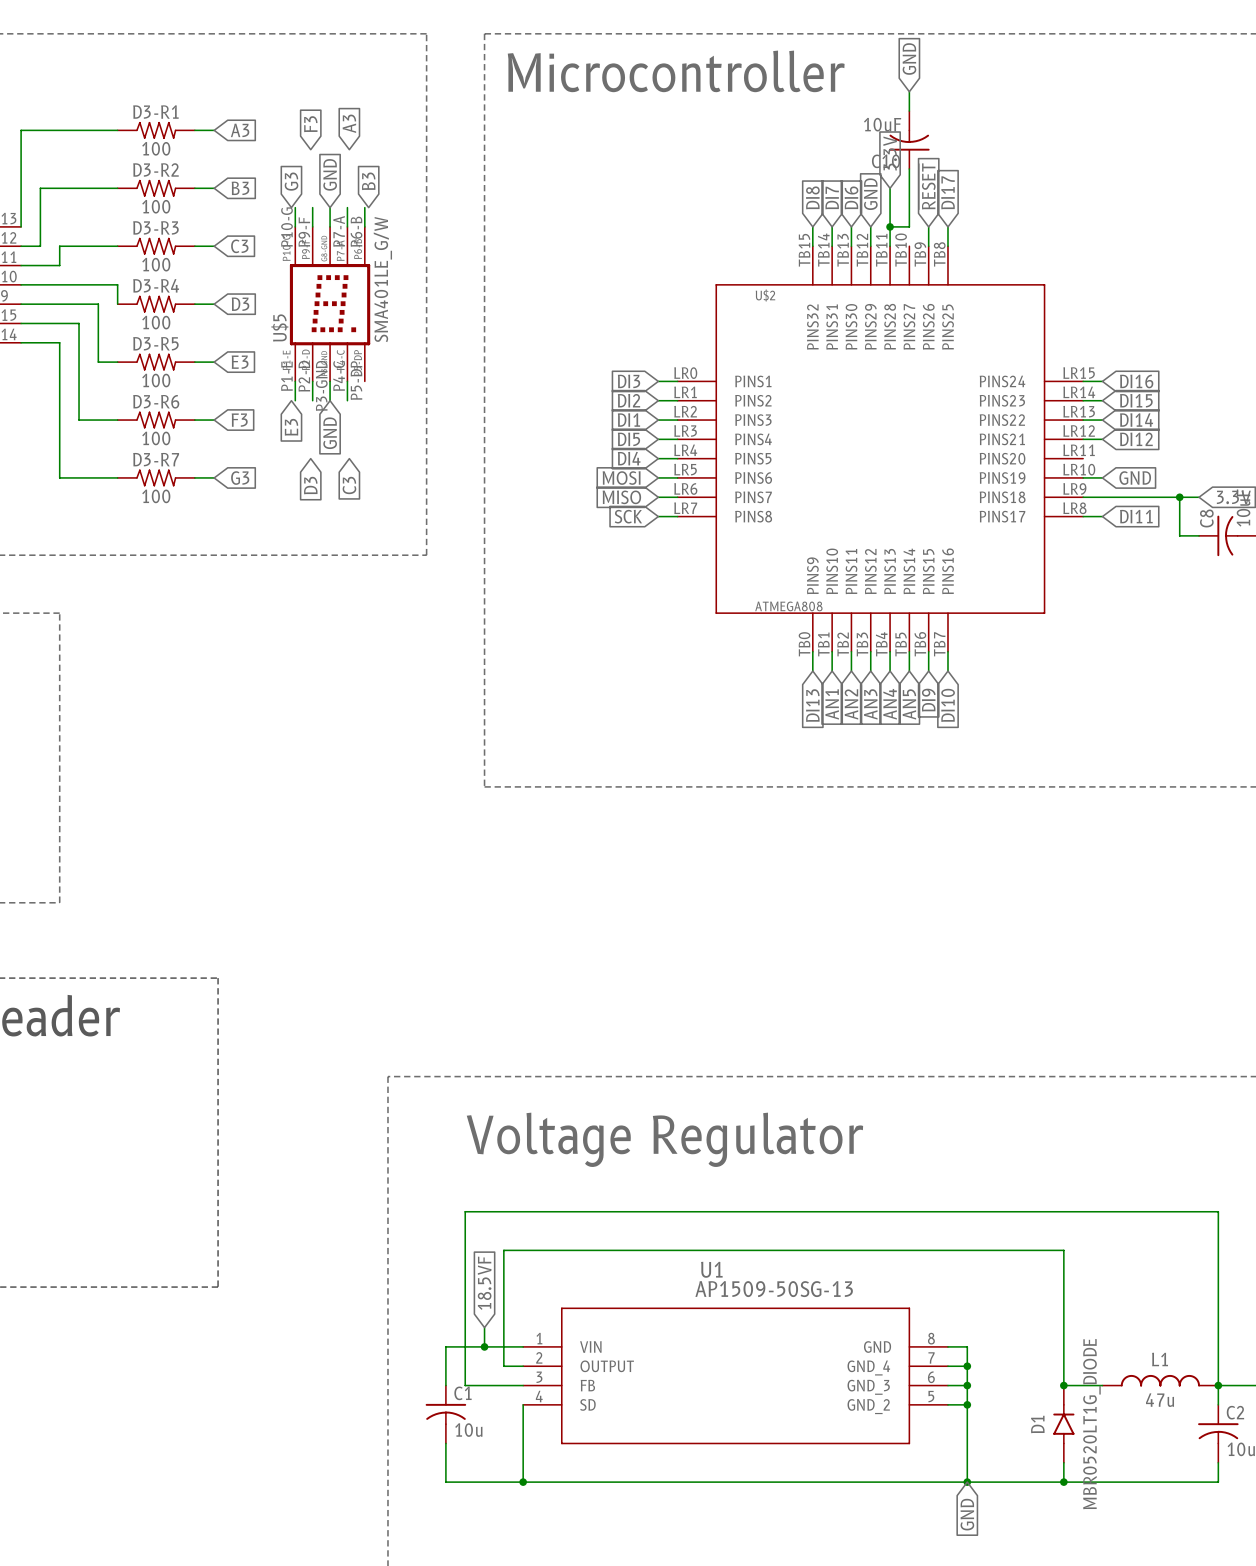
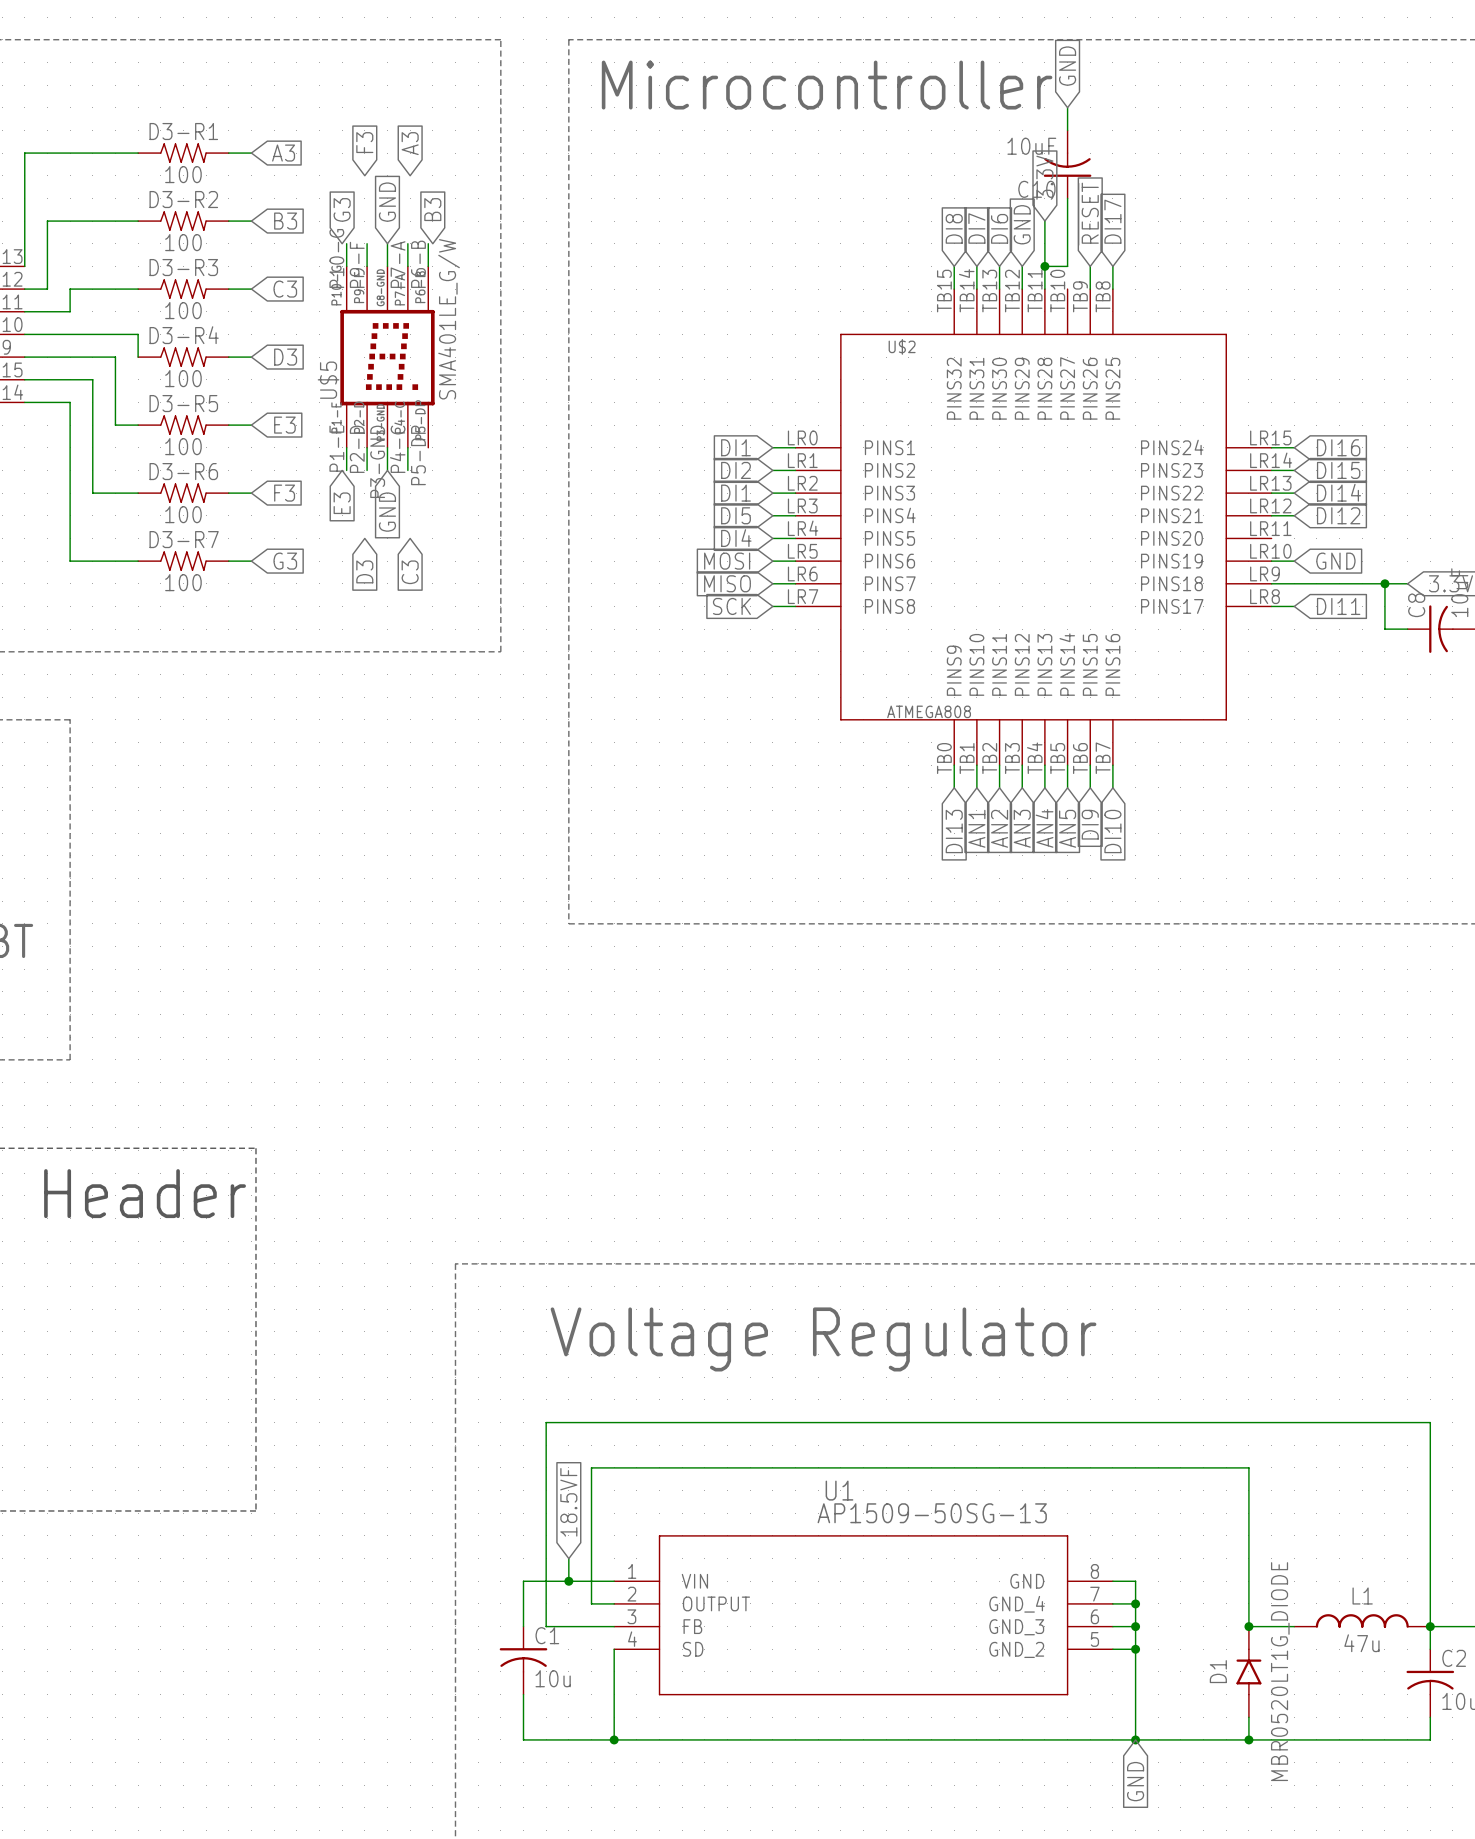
global label: DI3 (629, 381) -> DI1 (735, 447)

